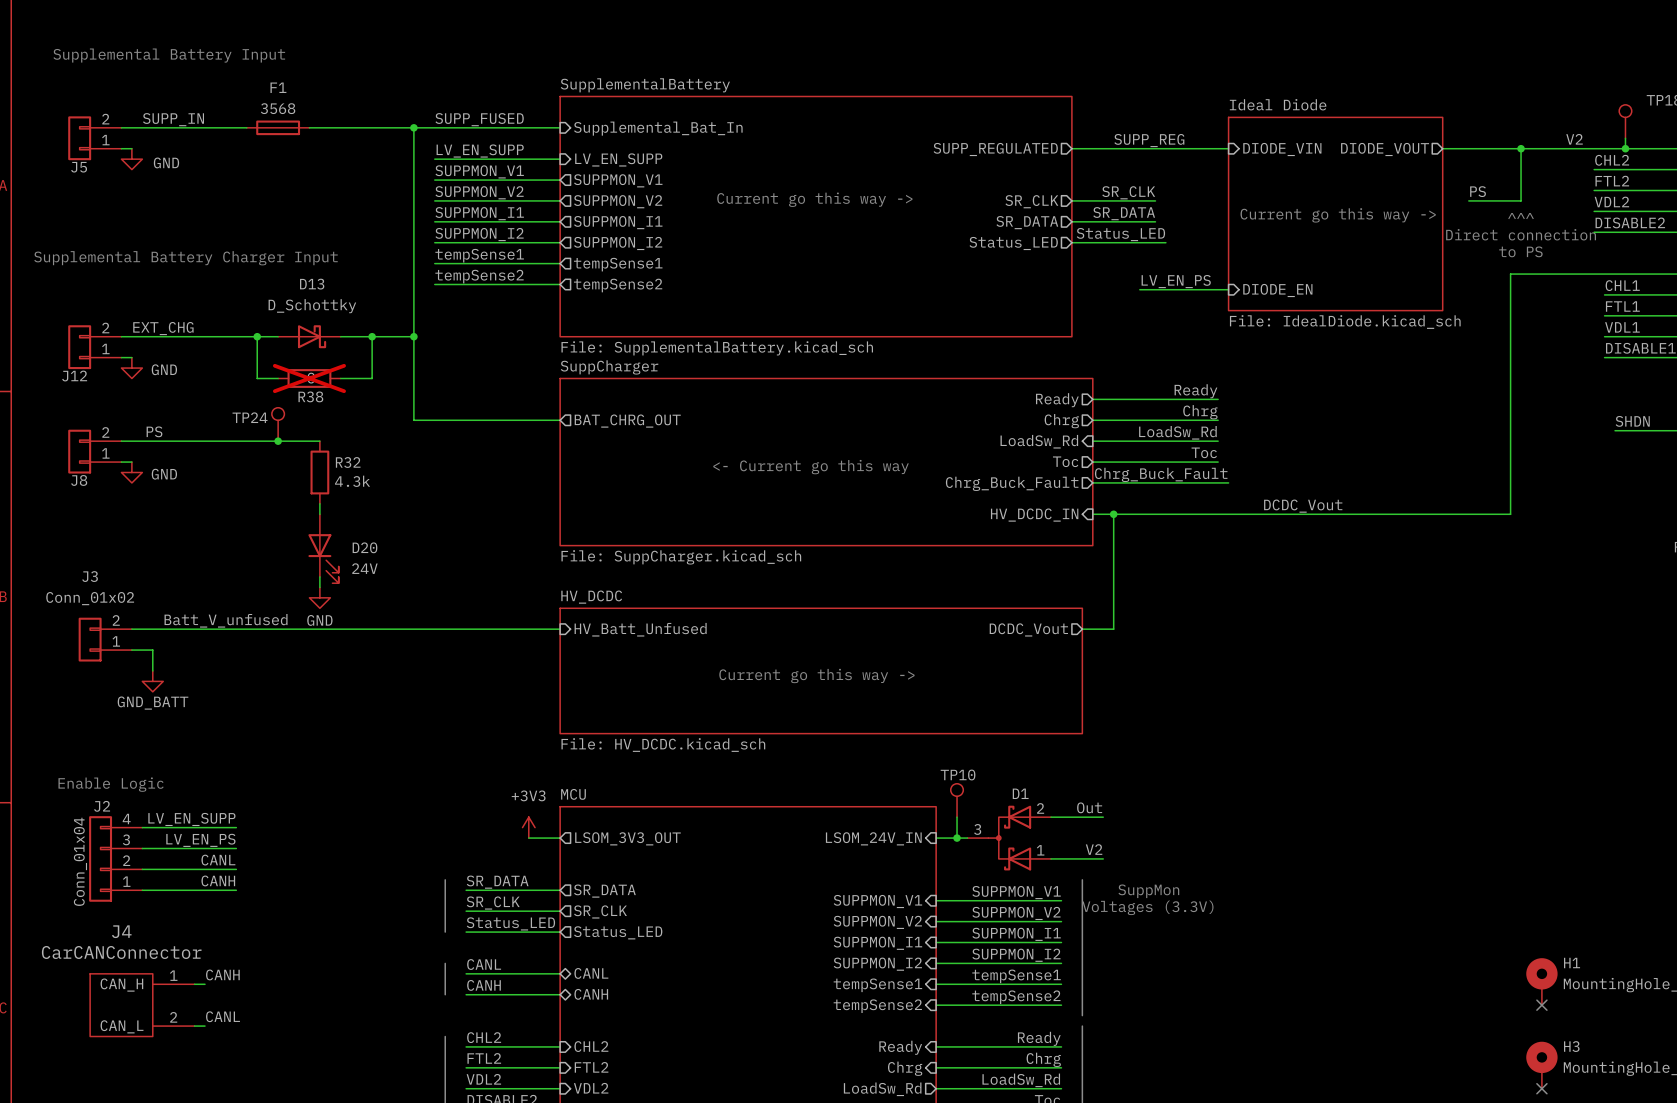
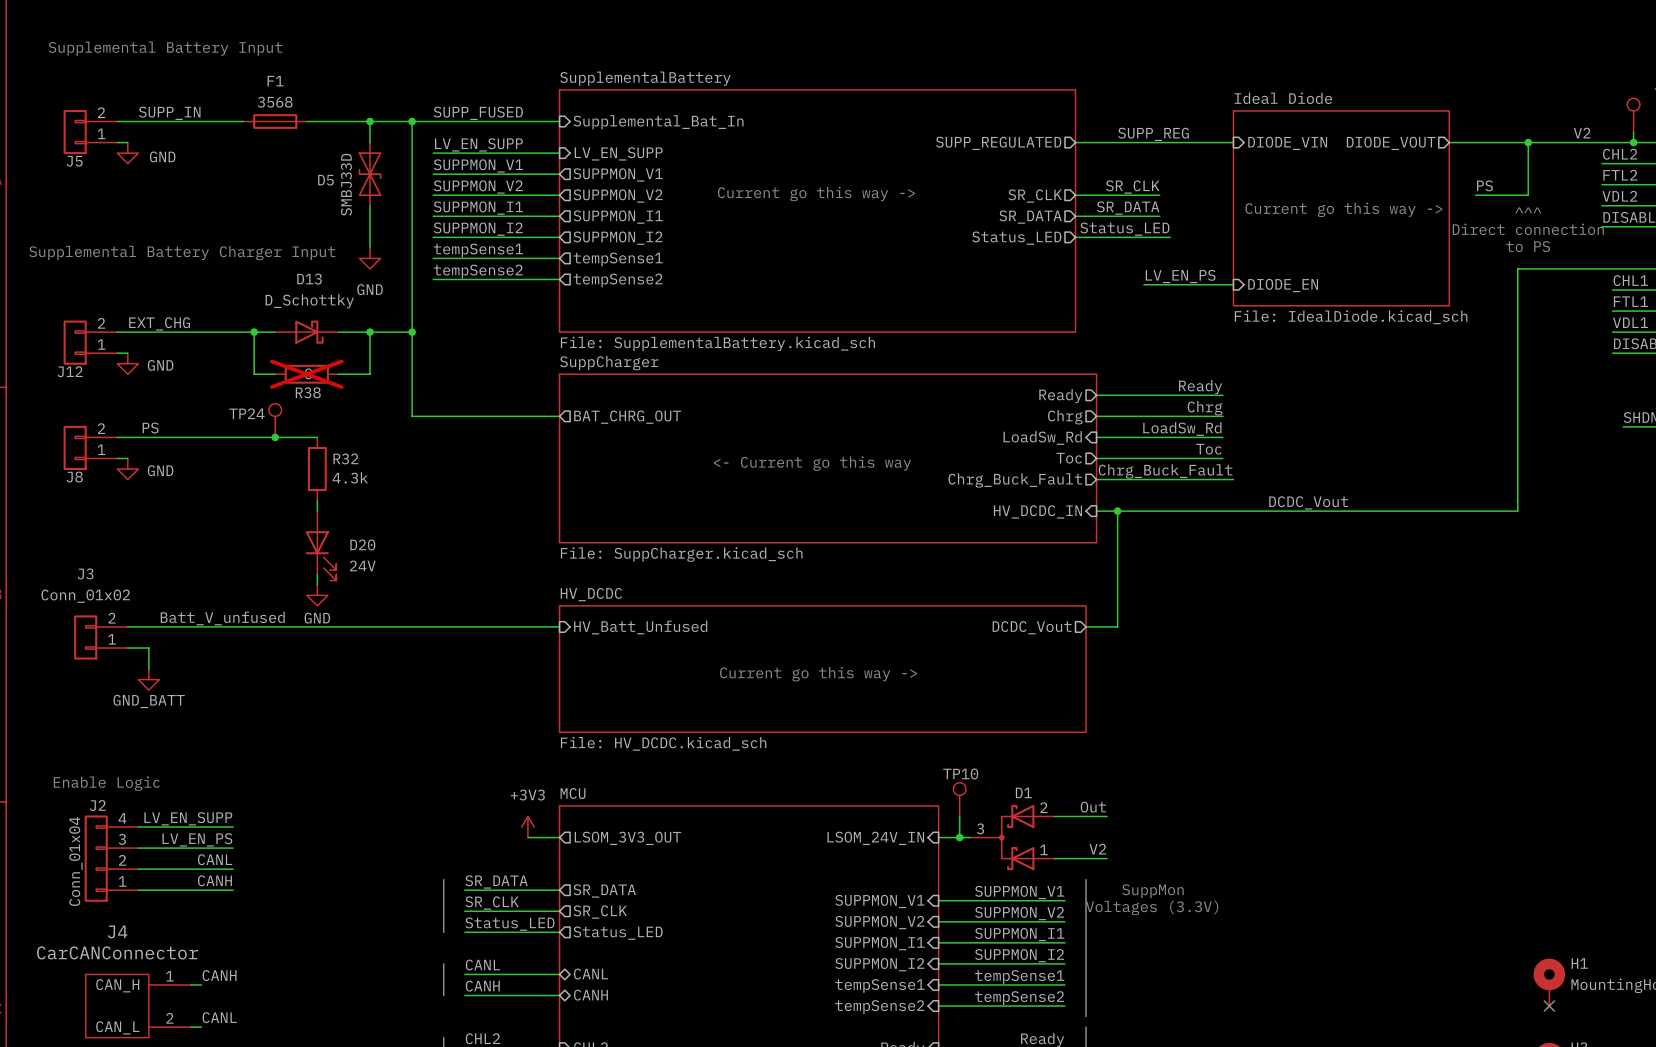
wire: none -> (370, 121) (370, 142)
junction: none -> (370, 121)
D5: none -> SMBJ33D (370, 174)
wire: none -> (370, 205) (370, 247)
power symbol: none -> GND (370, 258)

